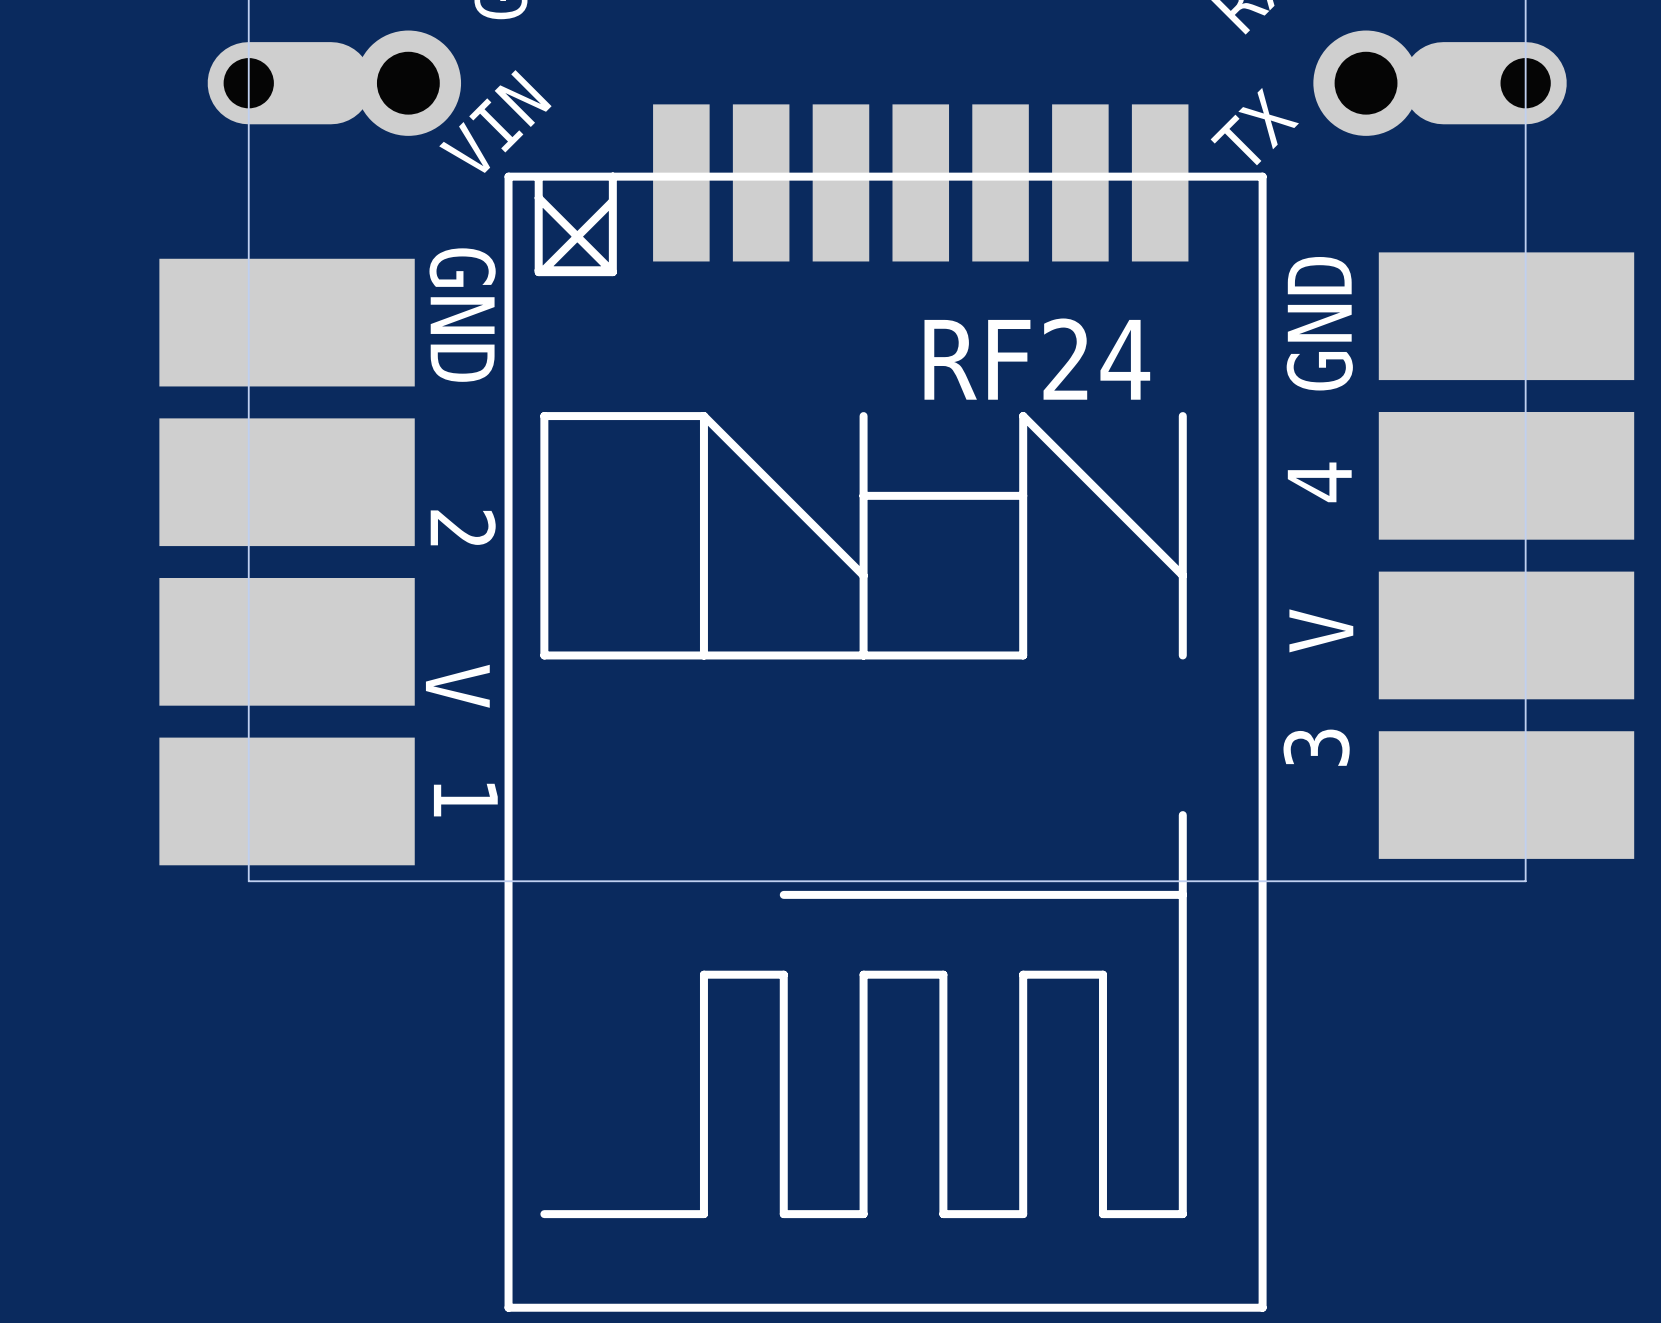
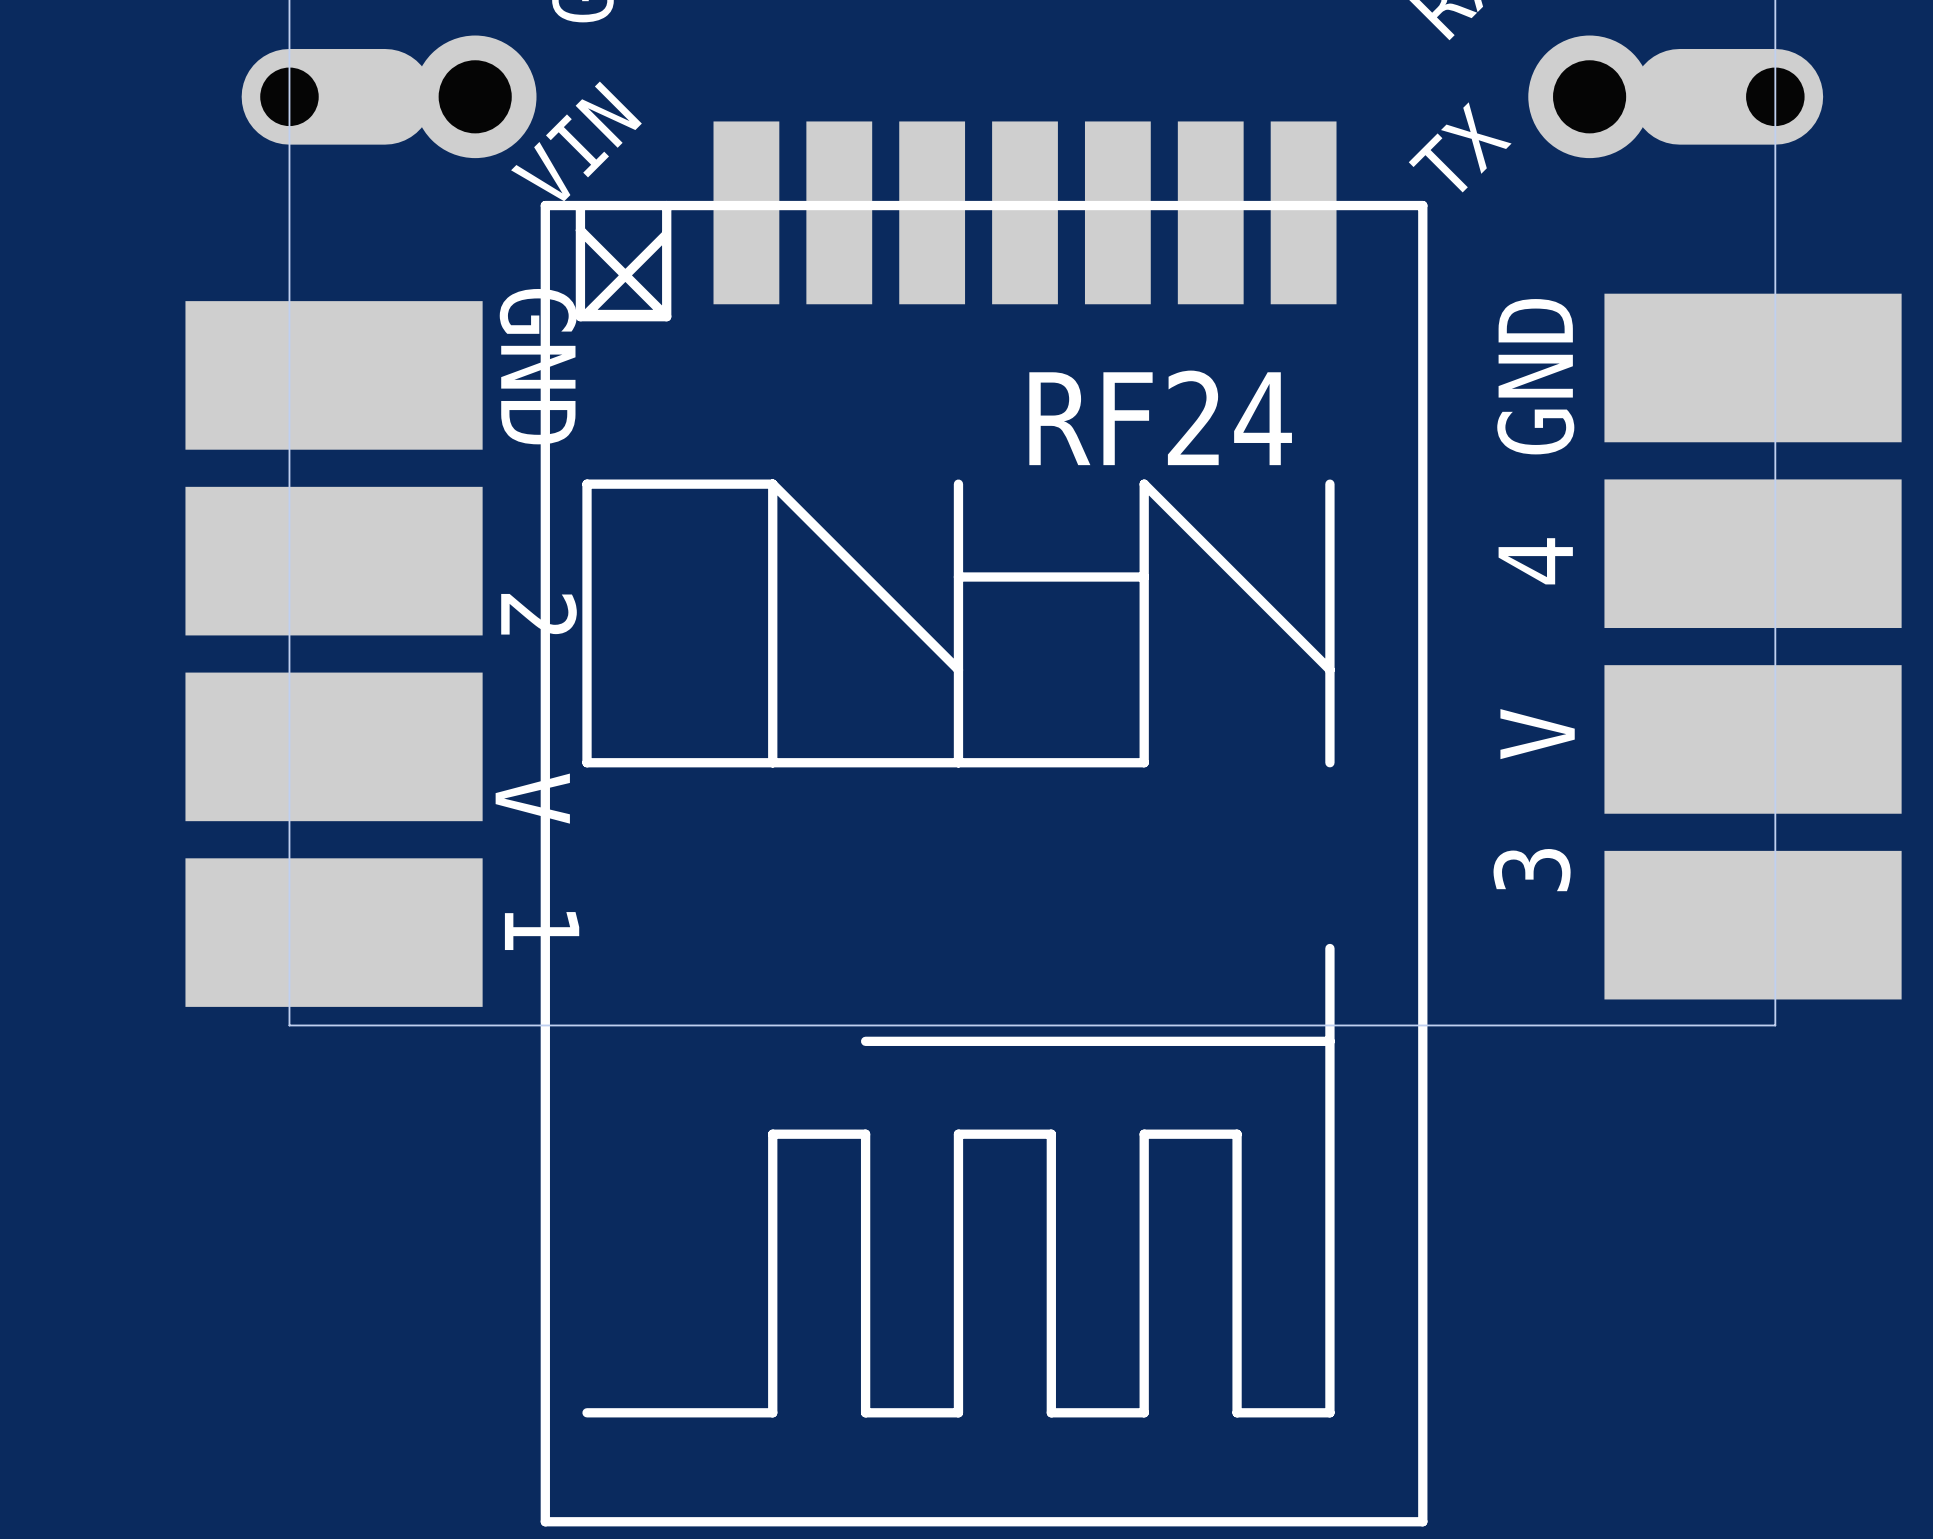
RF24 position: (885, 708) -> (984, 823)

